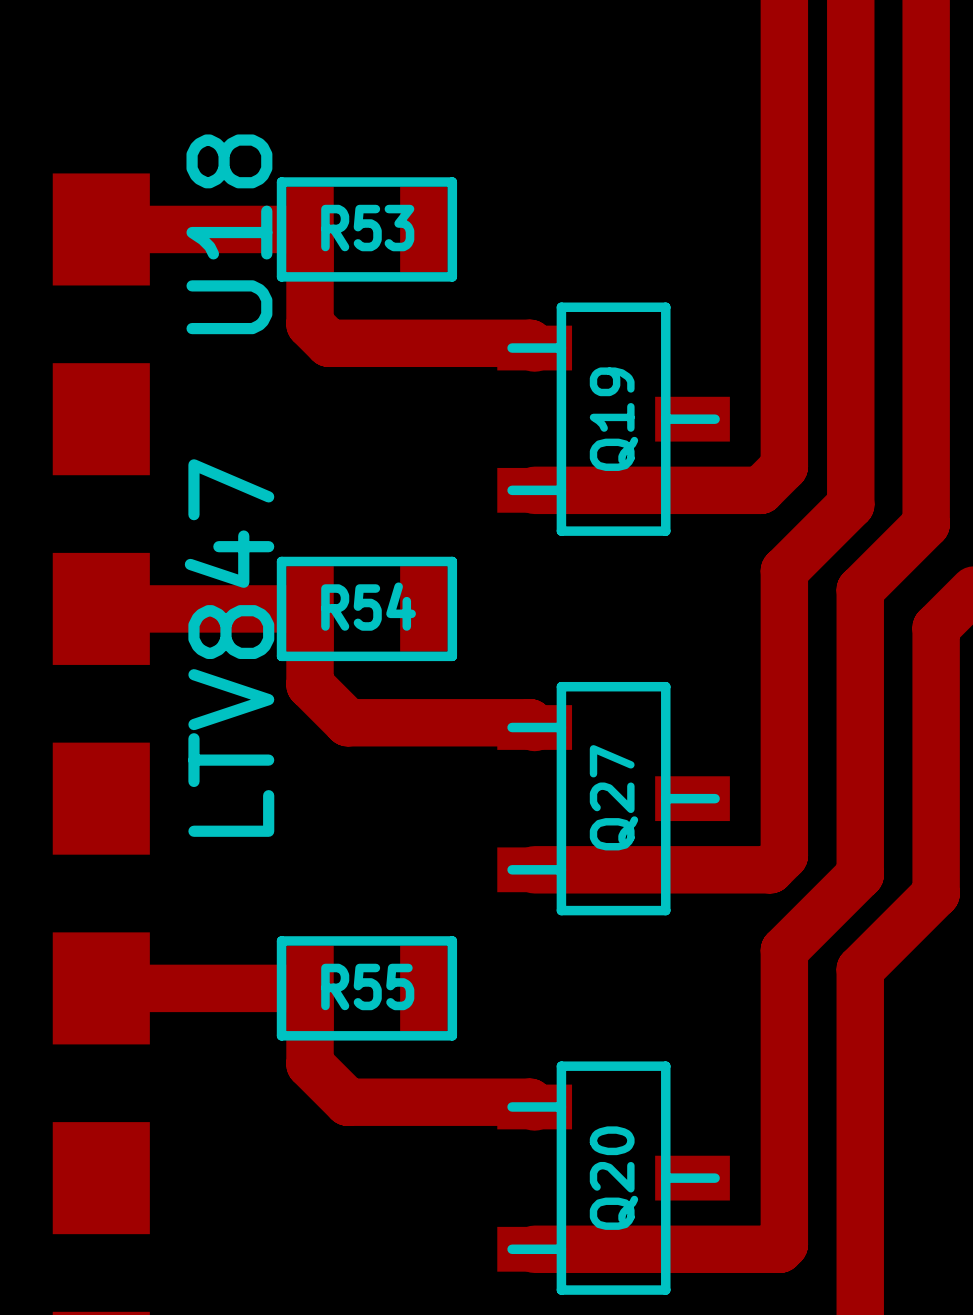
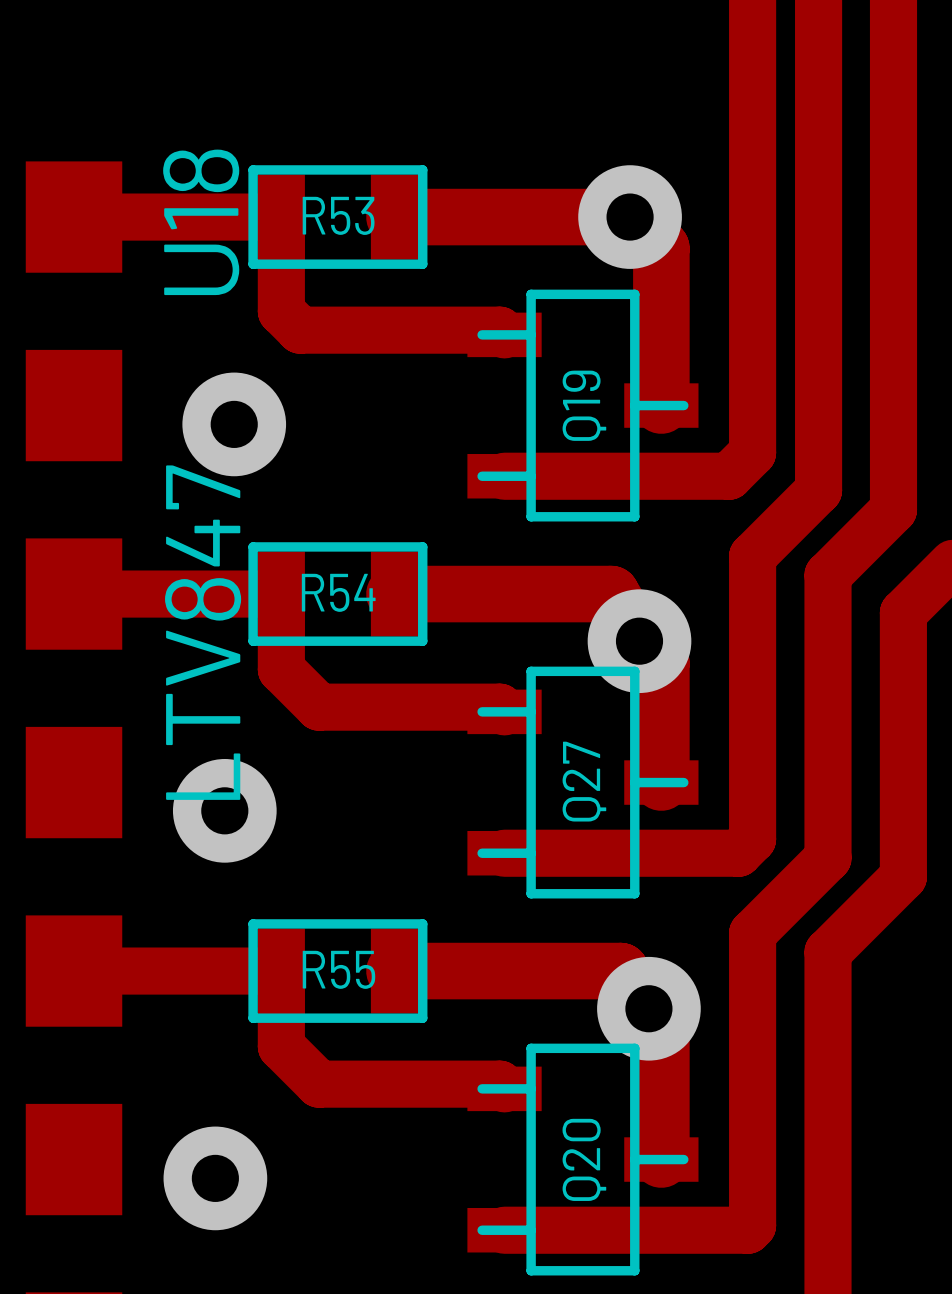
track: none -> (394, 217) (630, 217) (661, 248) (661, 405)
via: none -> (630, 217)
via: none -> (234, 424)
track: none -> (394, 594) (611, 594) (639, 641) (661, 663) (661, 782)
via: none -> (639, 641)
via: none -> (224, 810)
track: none -> (394, 971) (620, 971) (648, 1008) (661, 1021) (661, 1159)
via: none -> (648, 1008)
via: none -> (215, 1178)

